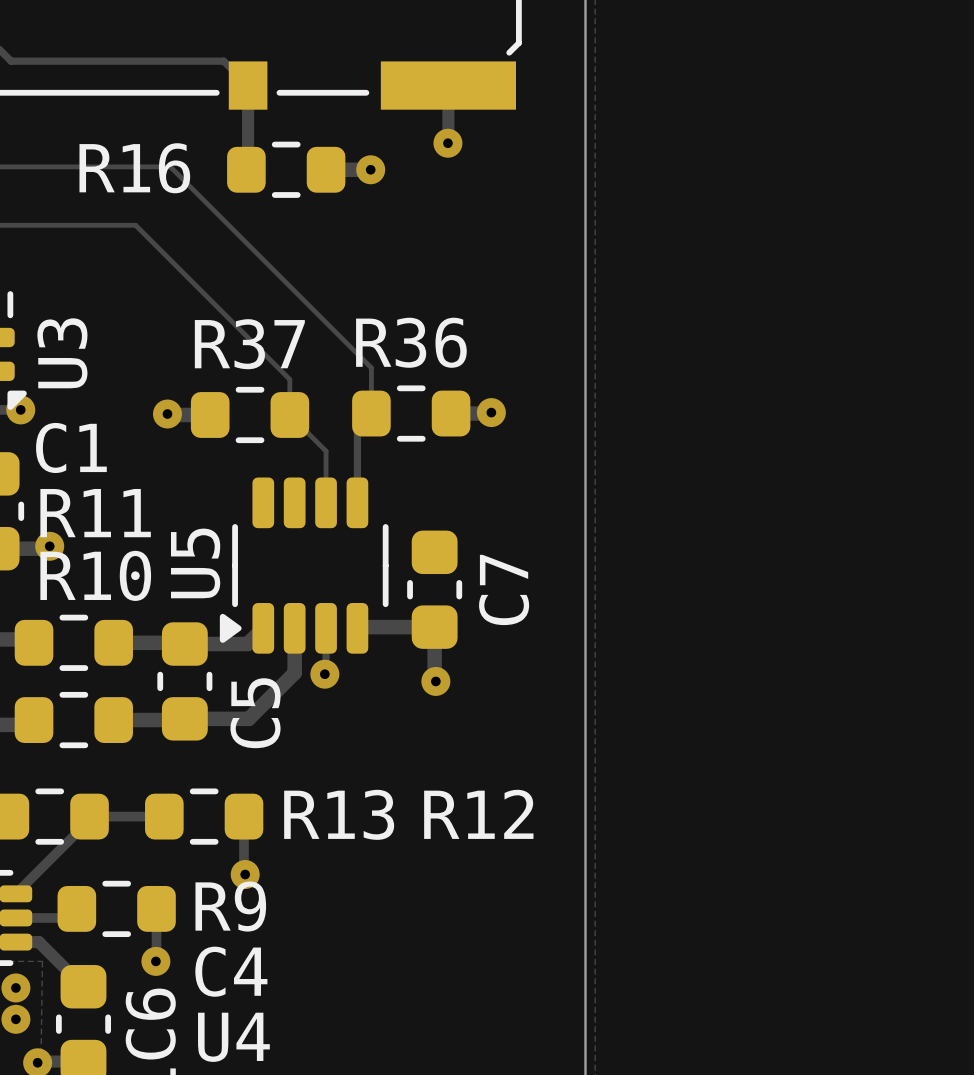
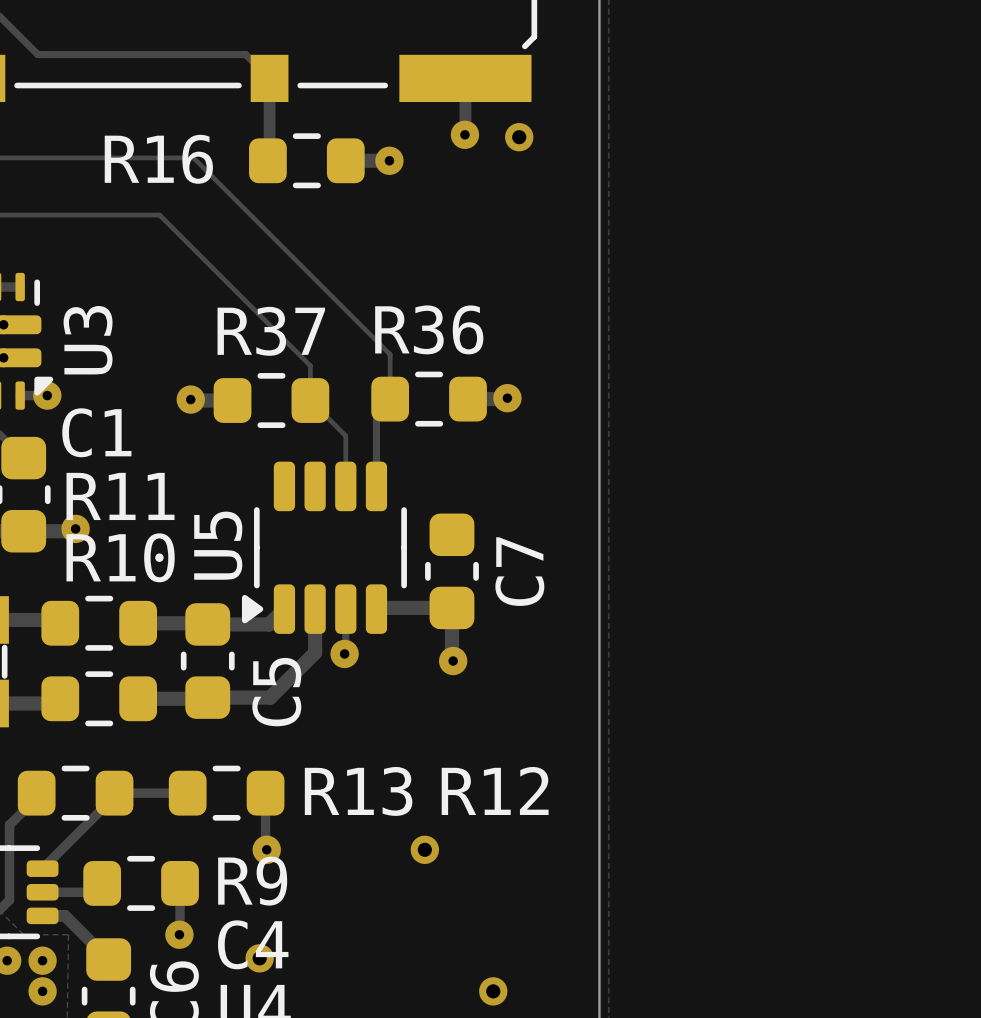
via: none -> (519, 137)
via: none -> (424, 849)
via: none -> (259, 958)
via: none -> (493, 991)

